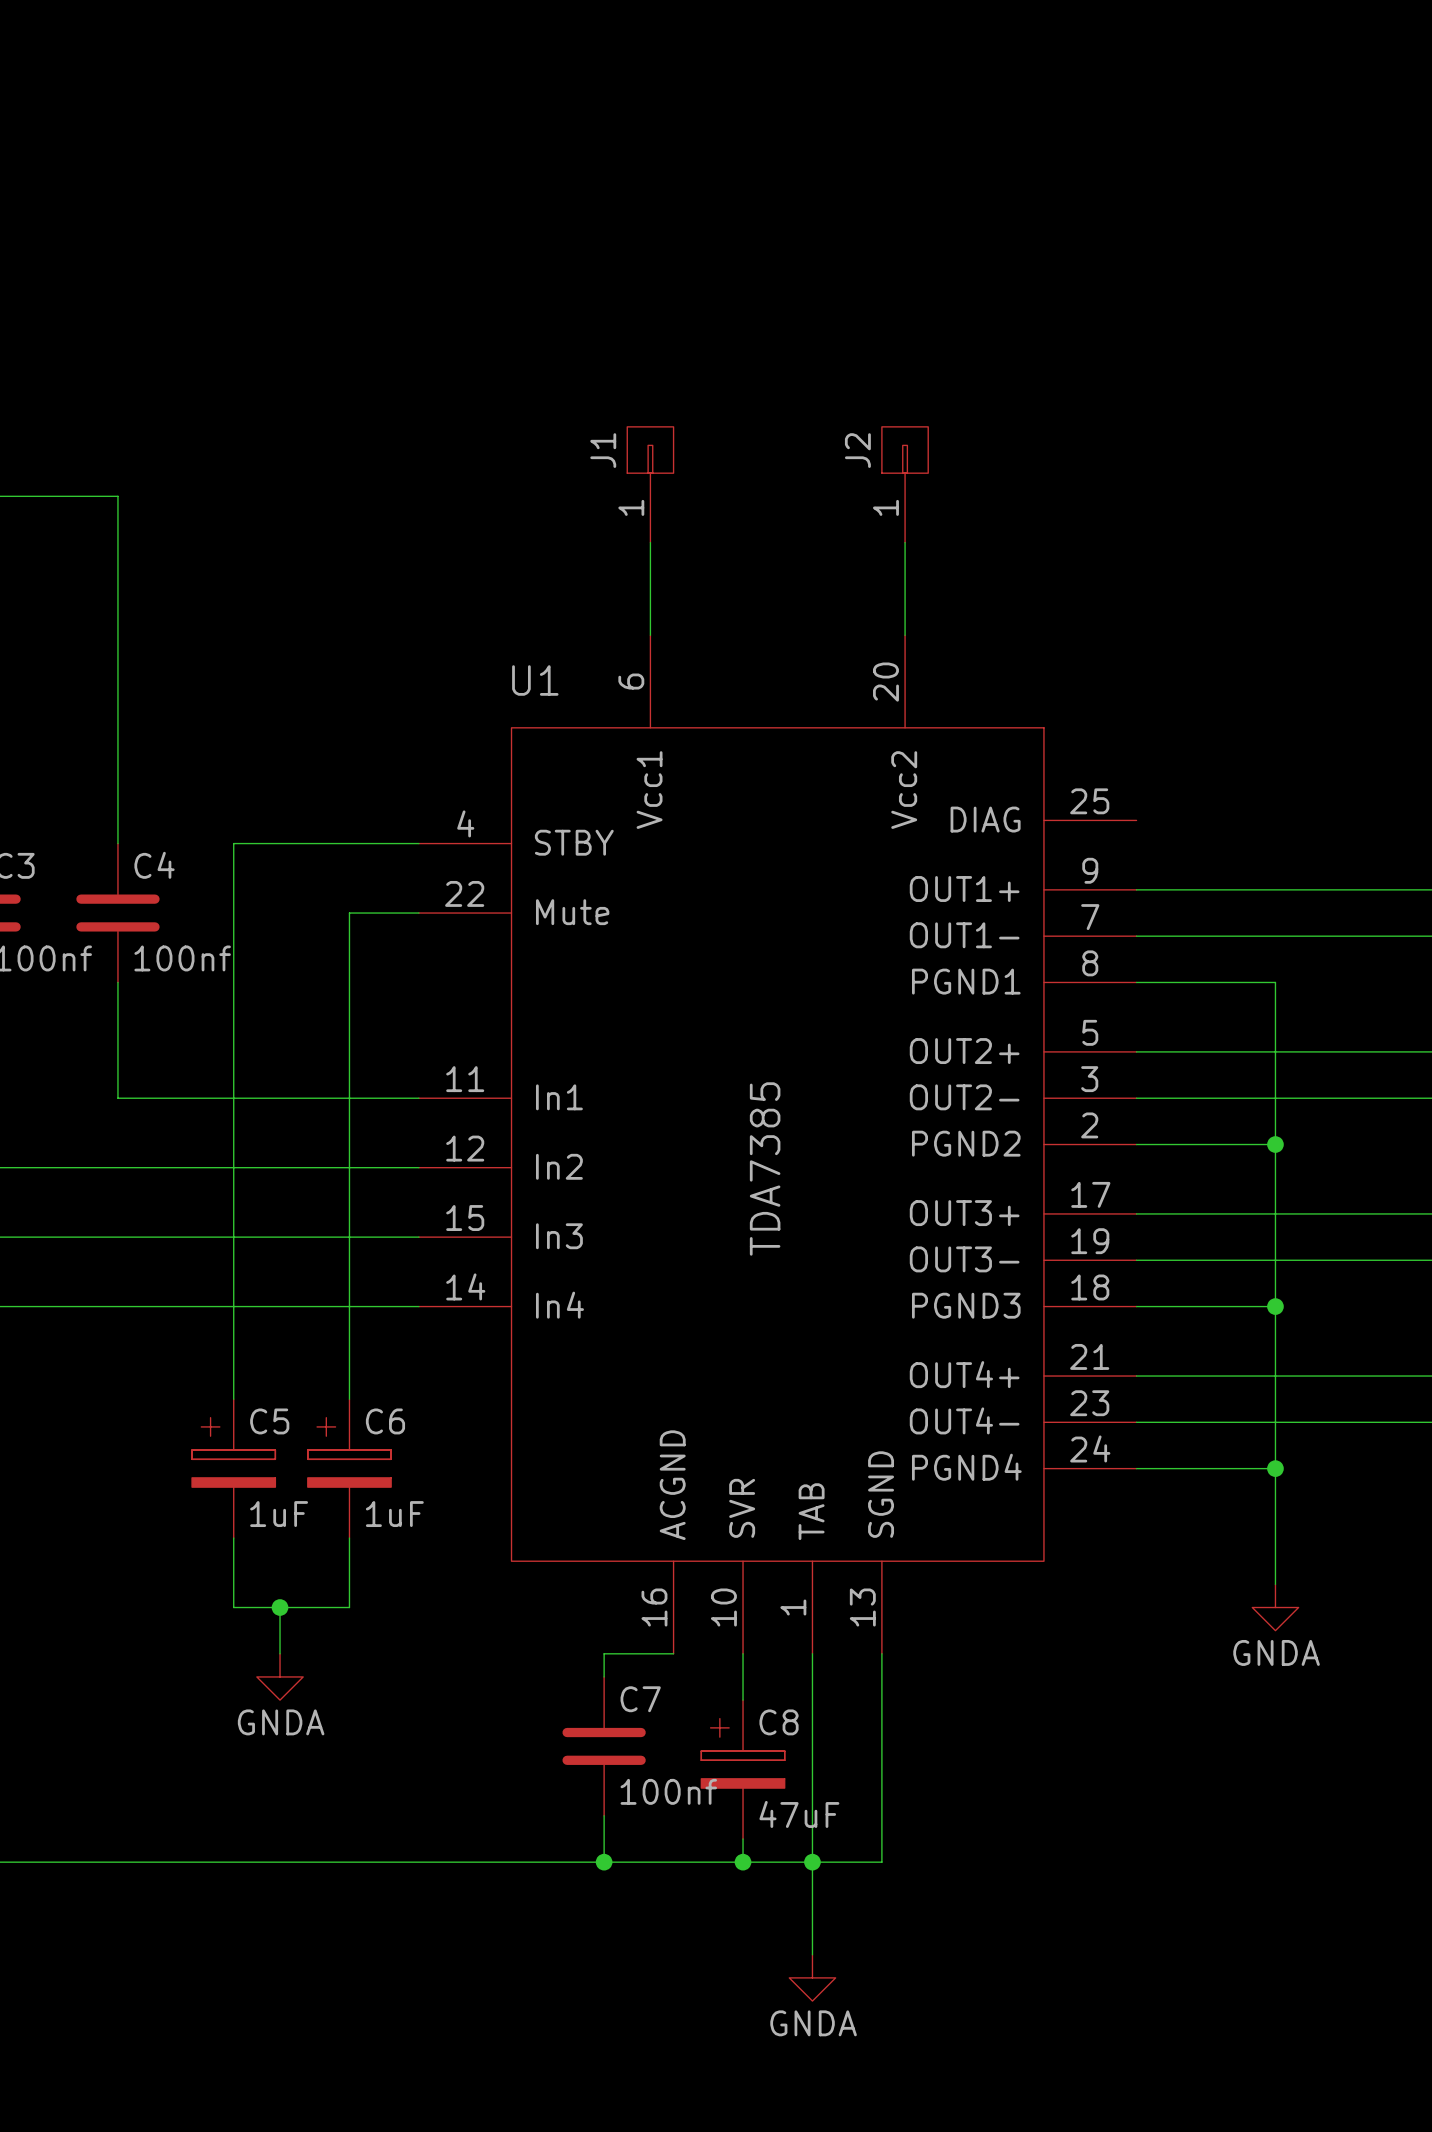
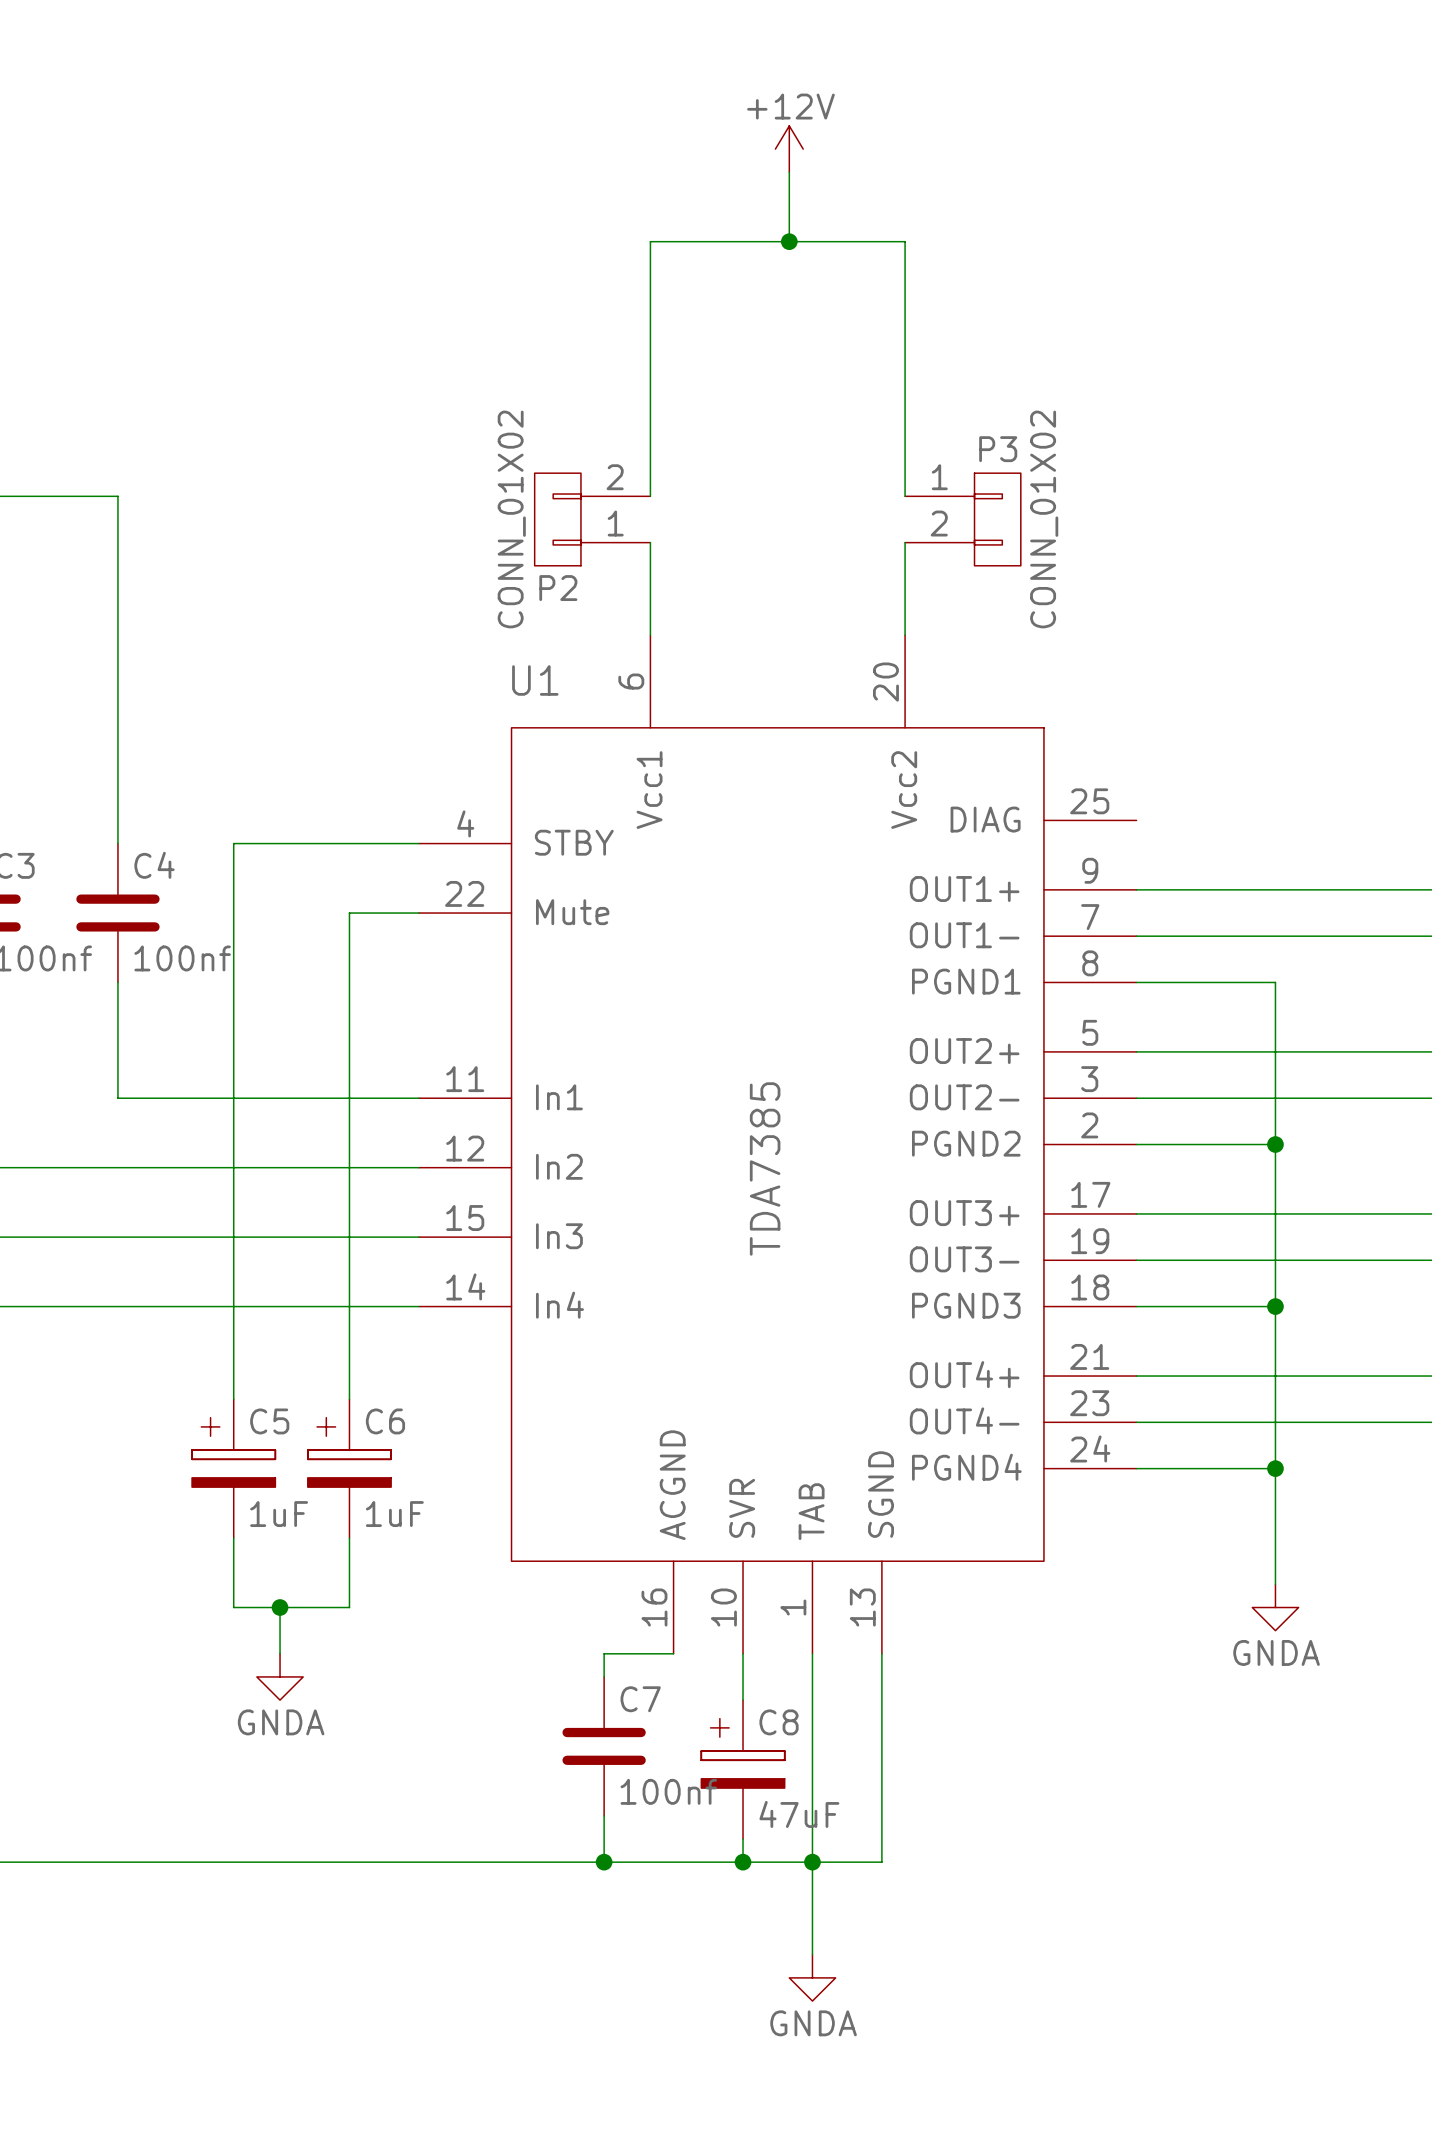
power symbol: none -> +12V (789, 149)
wire: none -> (789, 172) (789, 241)
junction: none -> (789, 241)
J1: (650, 484) -> none
J2: (905, 484) -> none
wire: none -> (650, 496) (650, 241) (905, 241) (905, 496)
P2: none -> CONN_01X02 (592, 519)
P3: none -> CONN_01X02 (962, 519)

